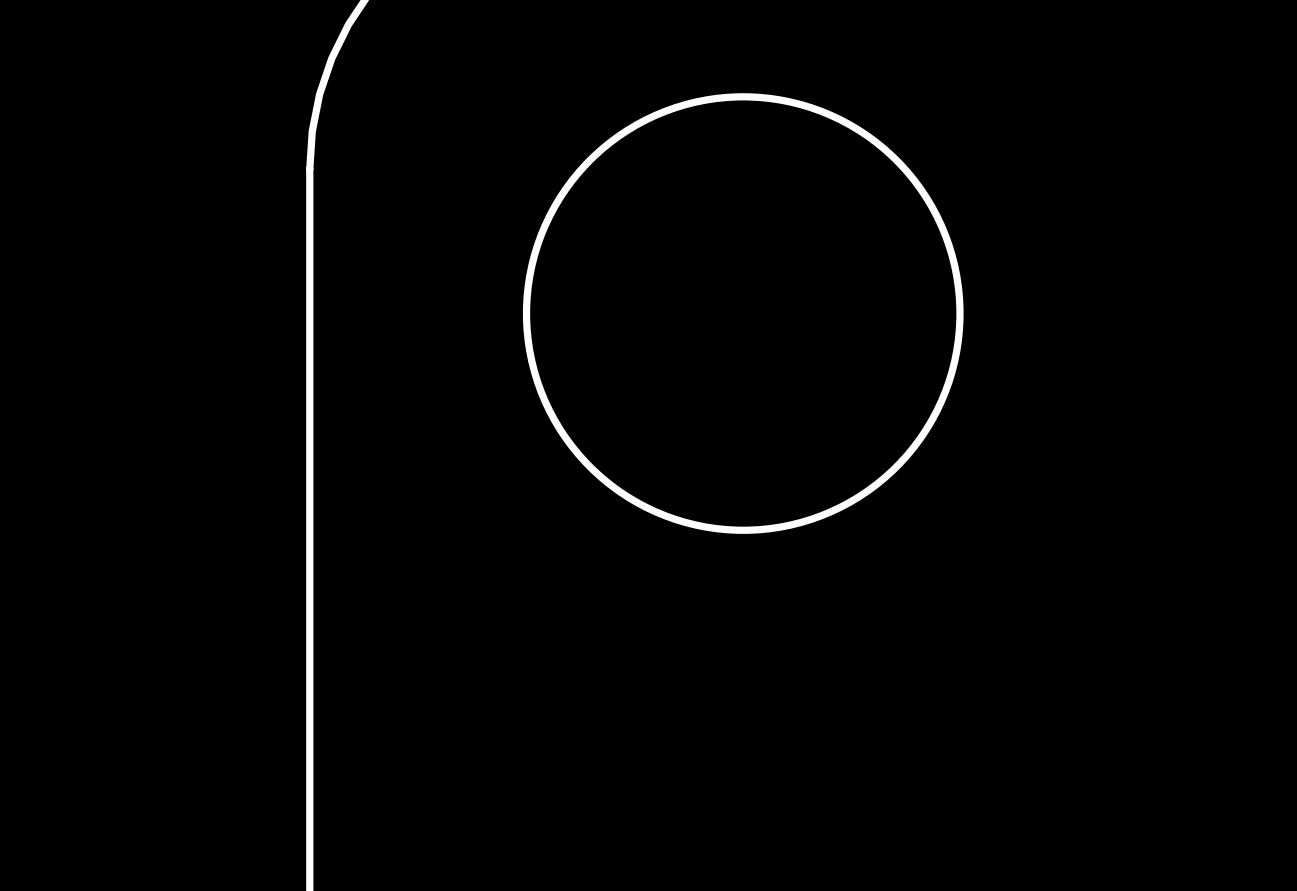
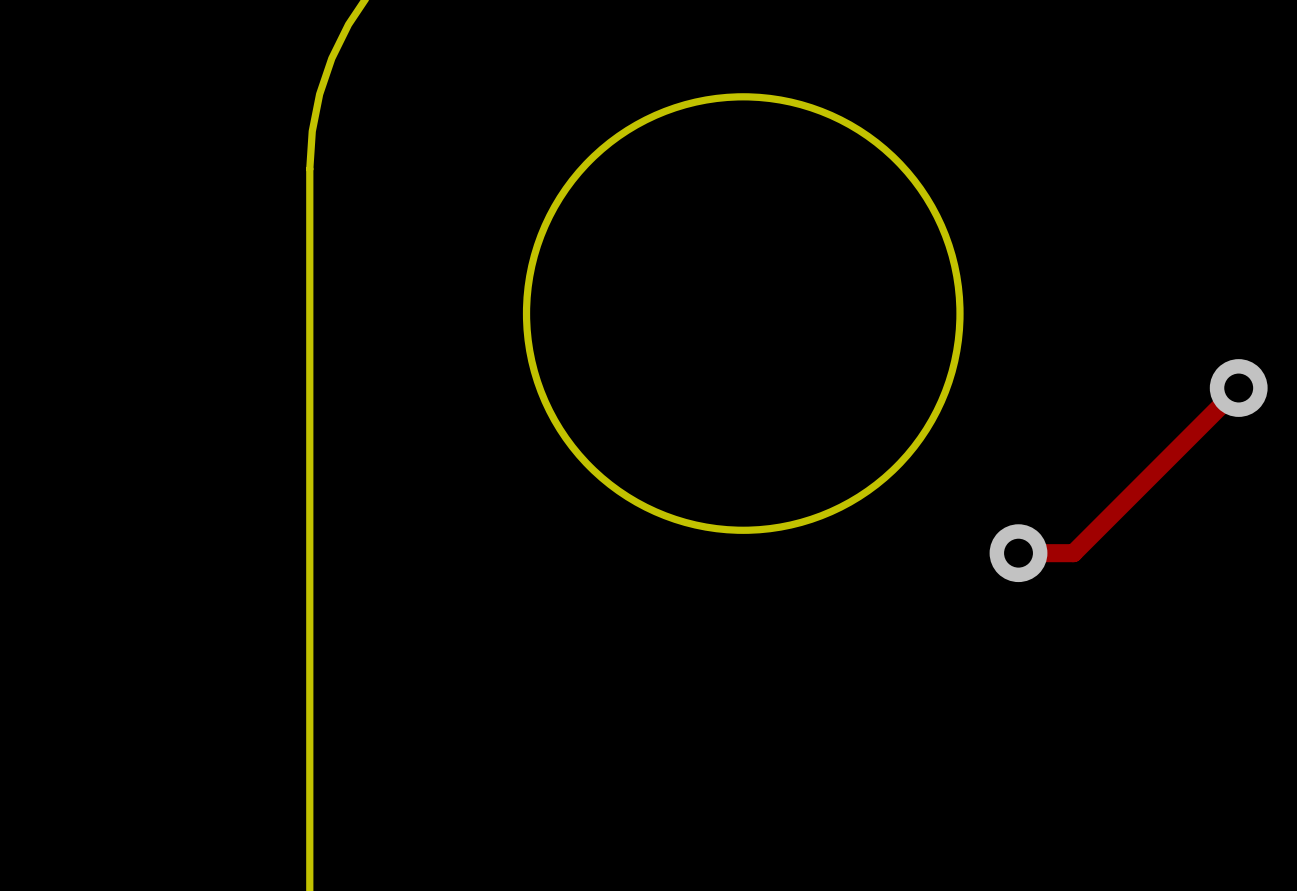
track: none -> (1238, 388) (1073, 553) (1018, 553)
via: none -> (1238, 388)
via: none -> (1018, 553)

